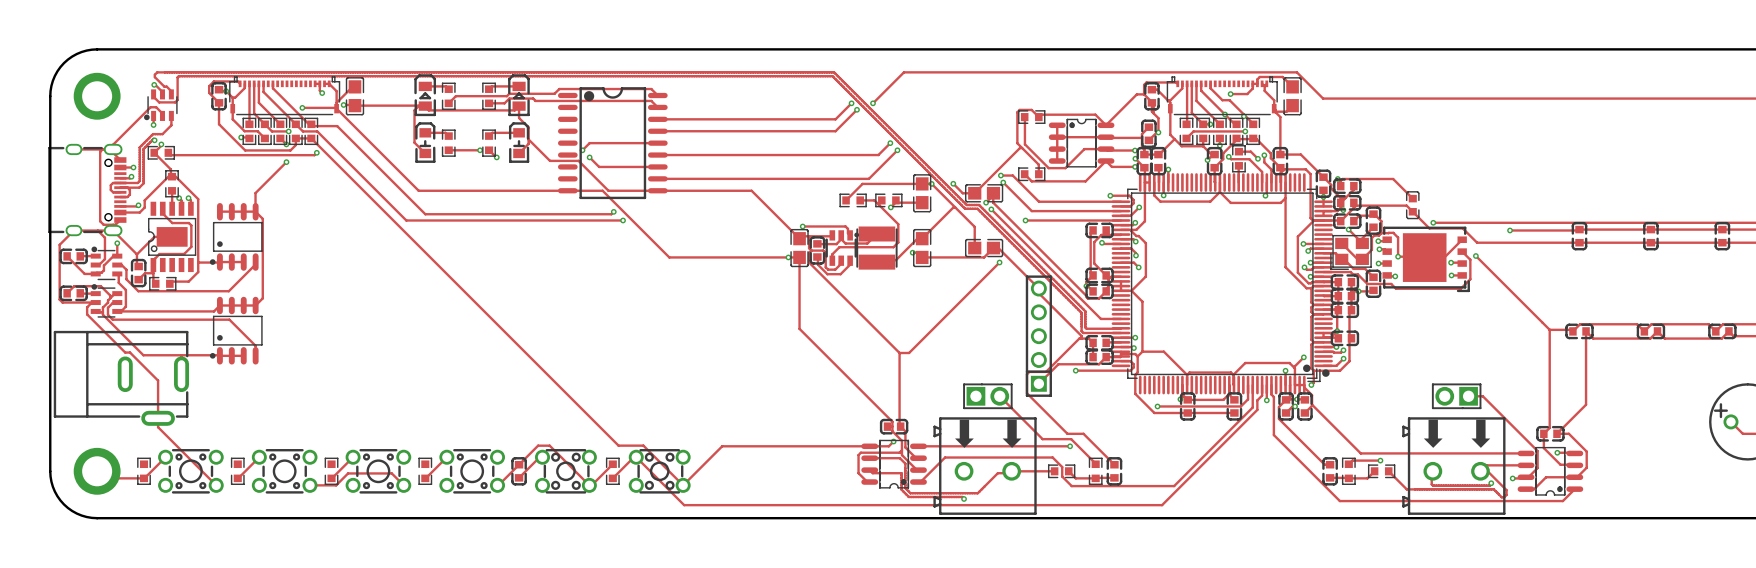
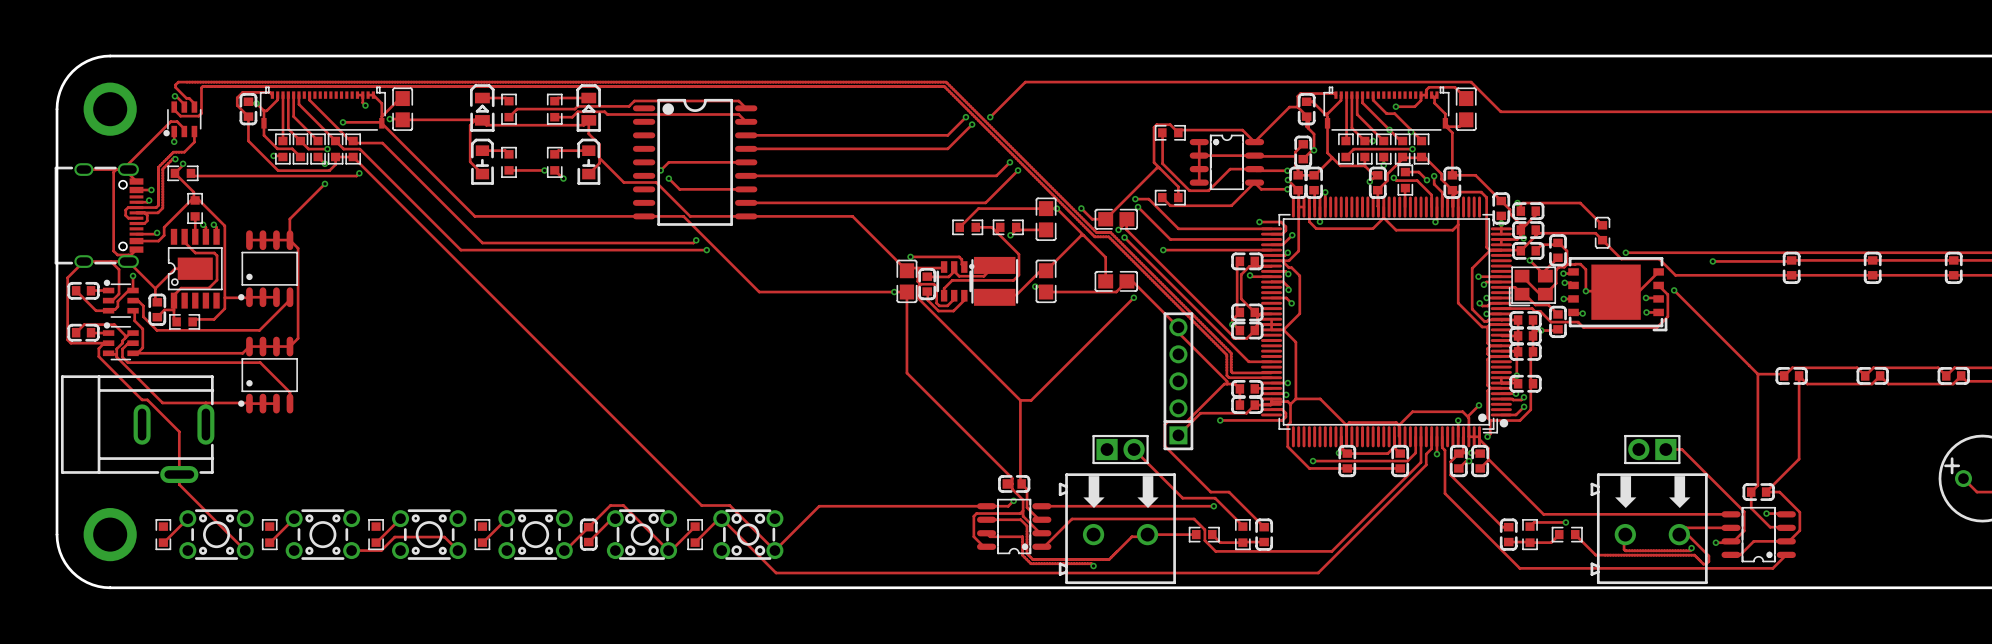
track: (97, 471) (104, 478) (144, 478) -> none

